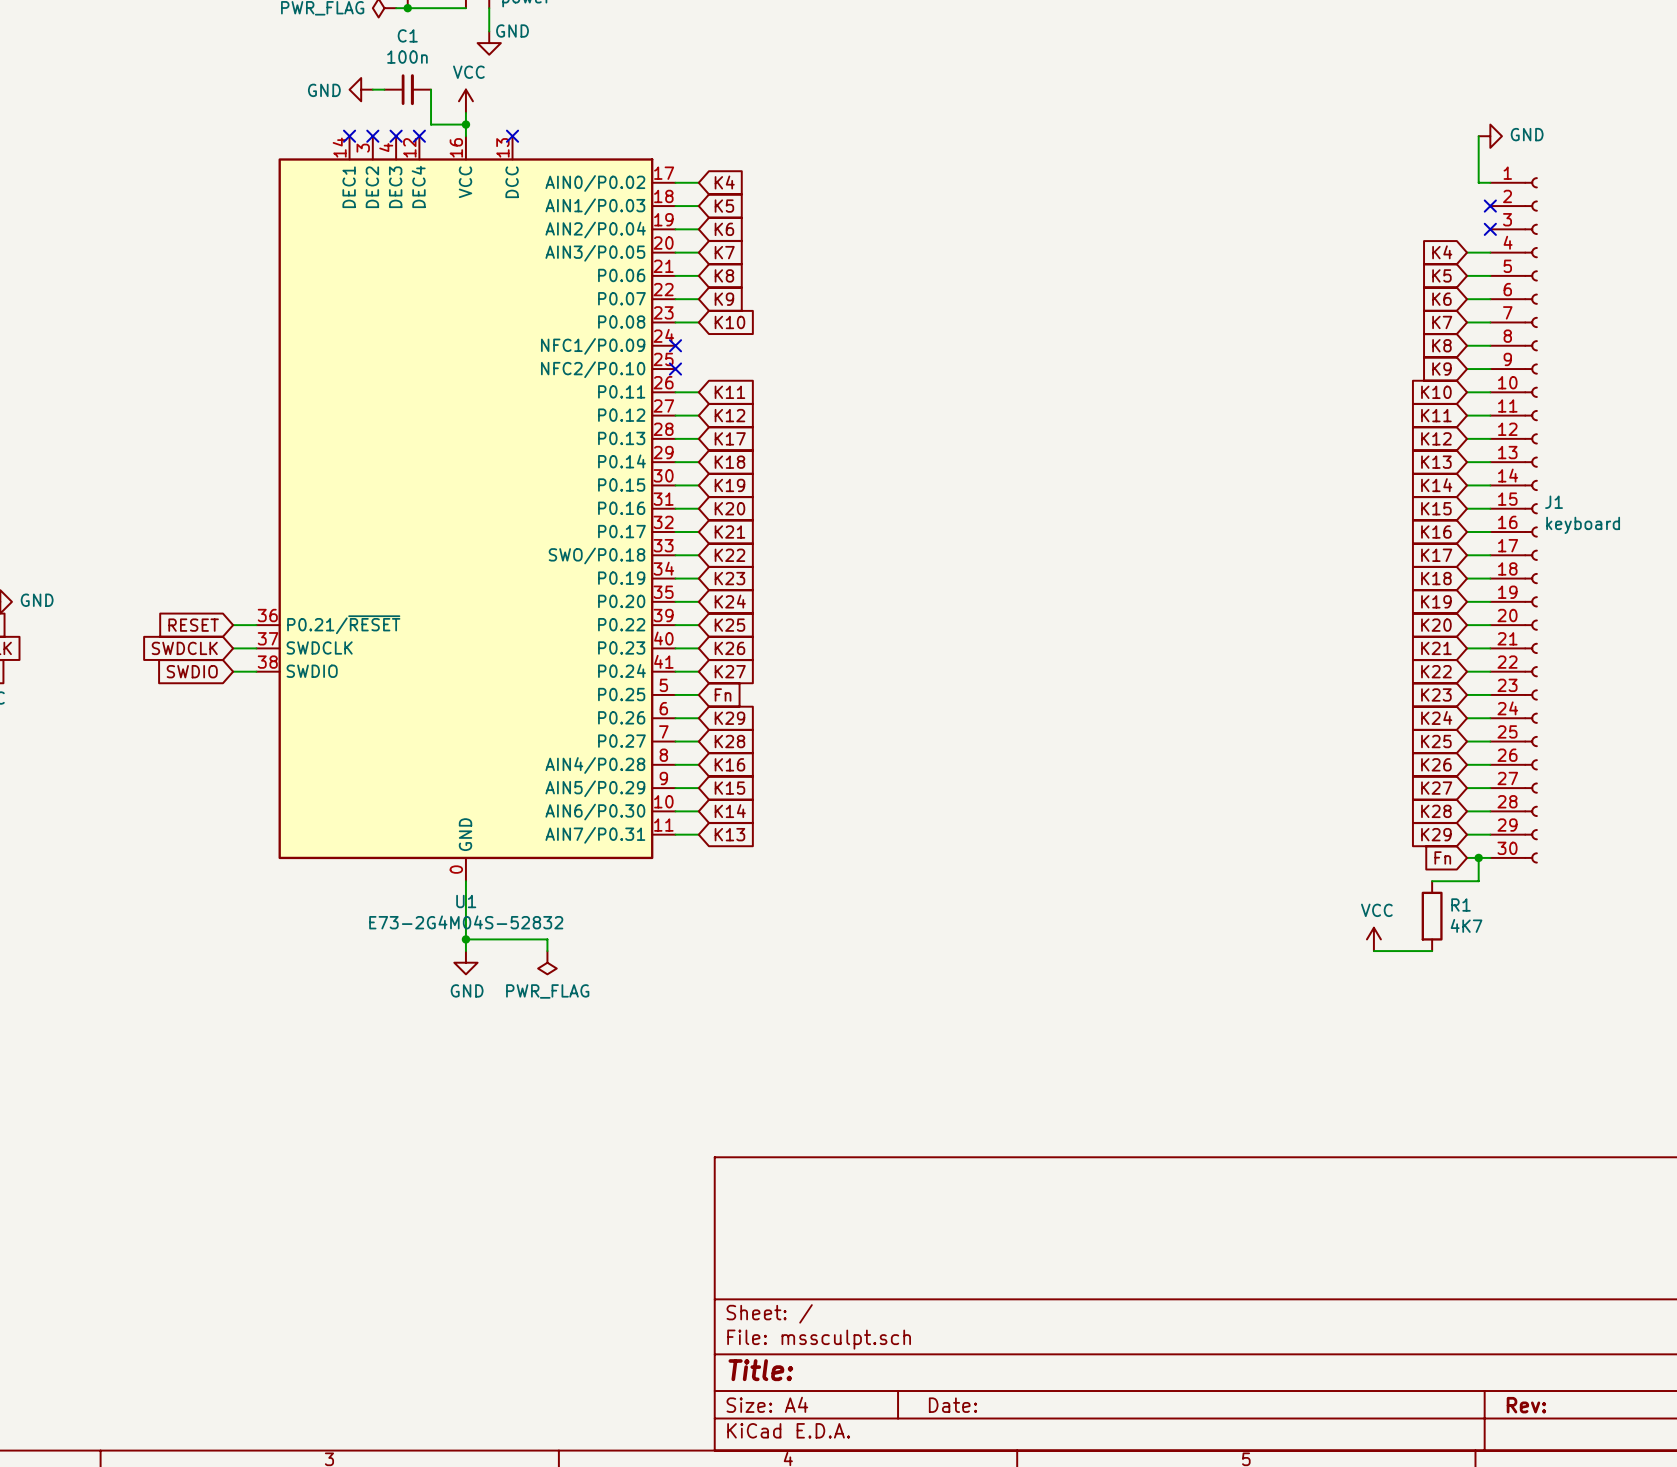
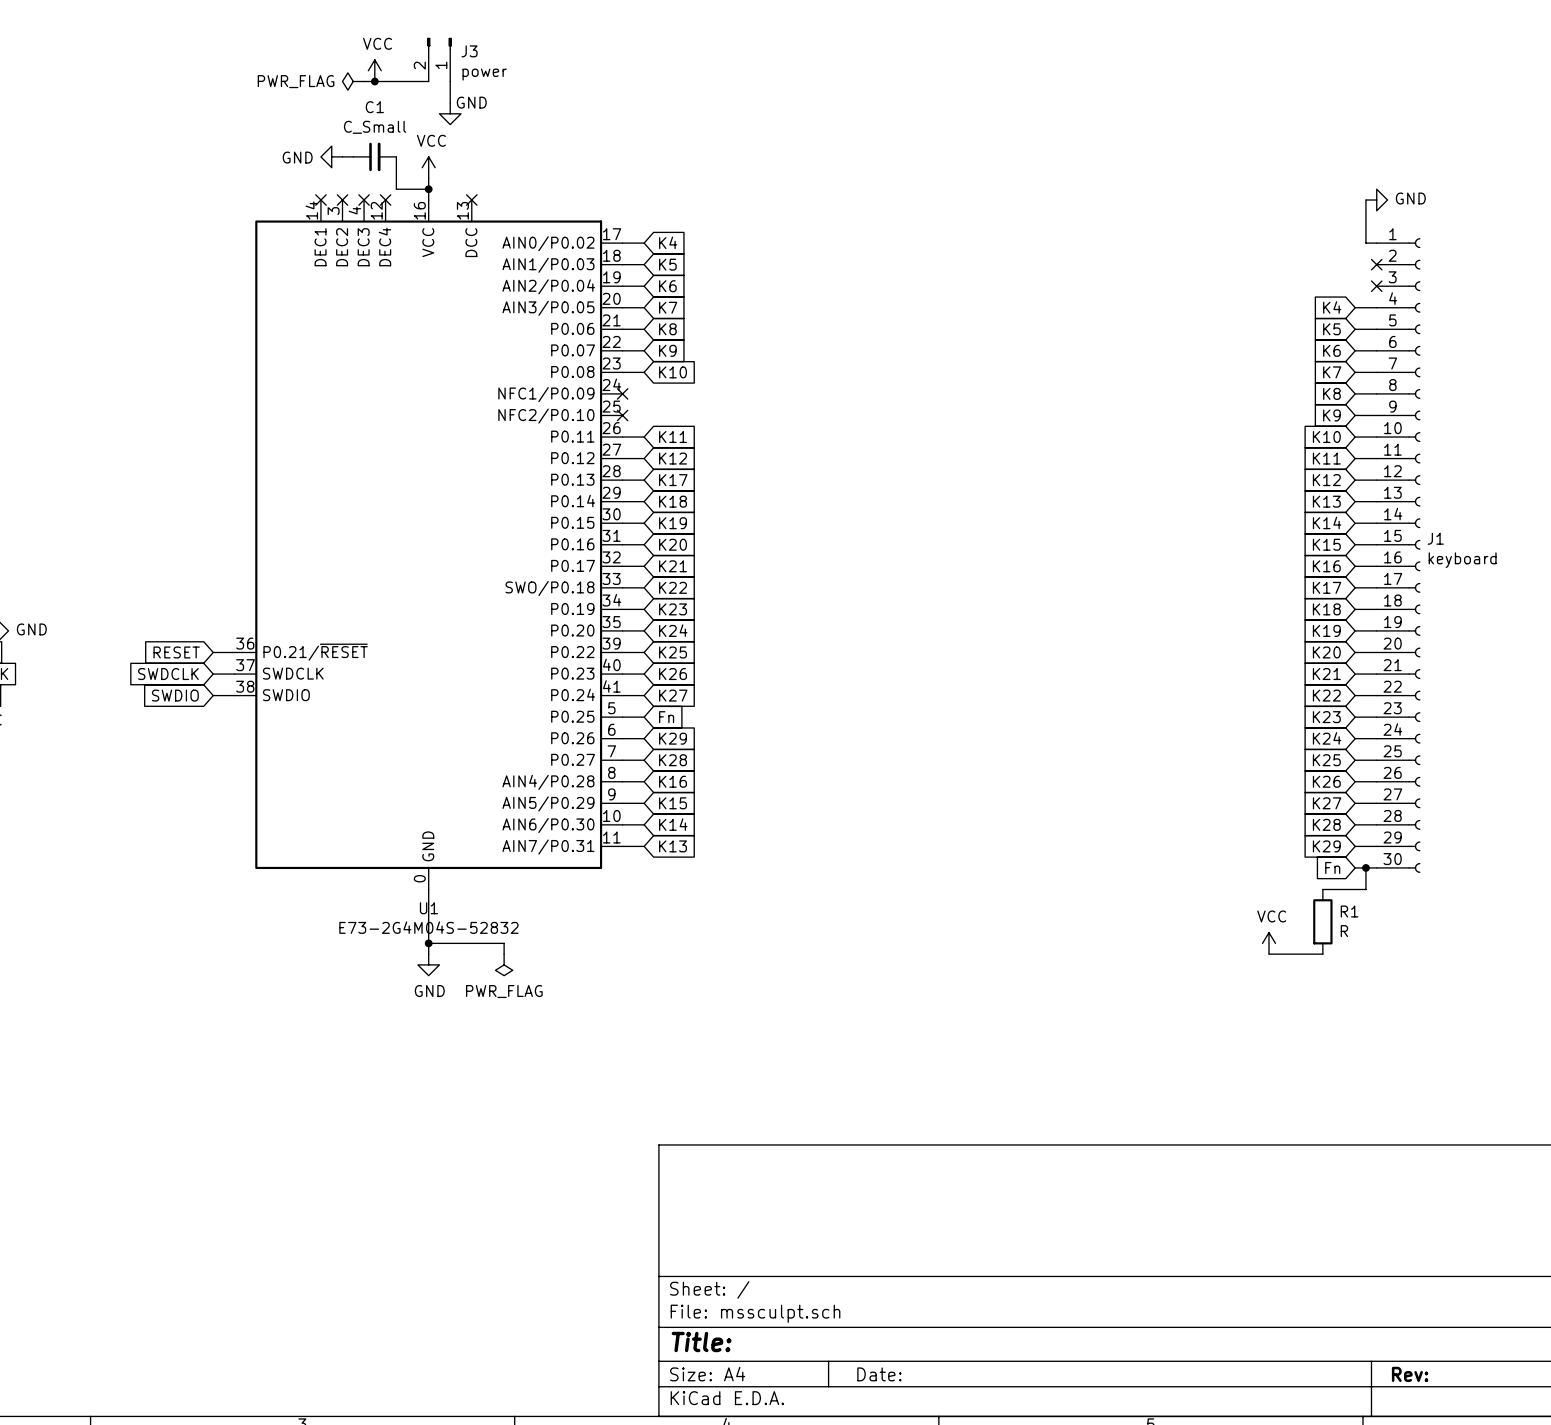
C1 value: 100n (407, 57) -> C_Small (375, 127)
R1 value: 4K7 (1466, 925) -> R (1344, 931)

